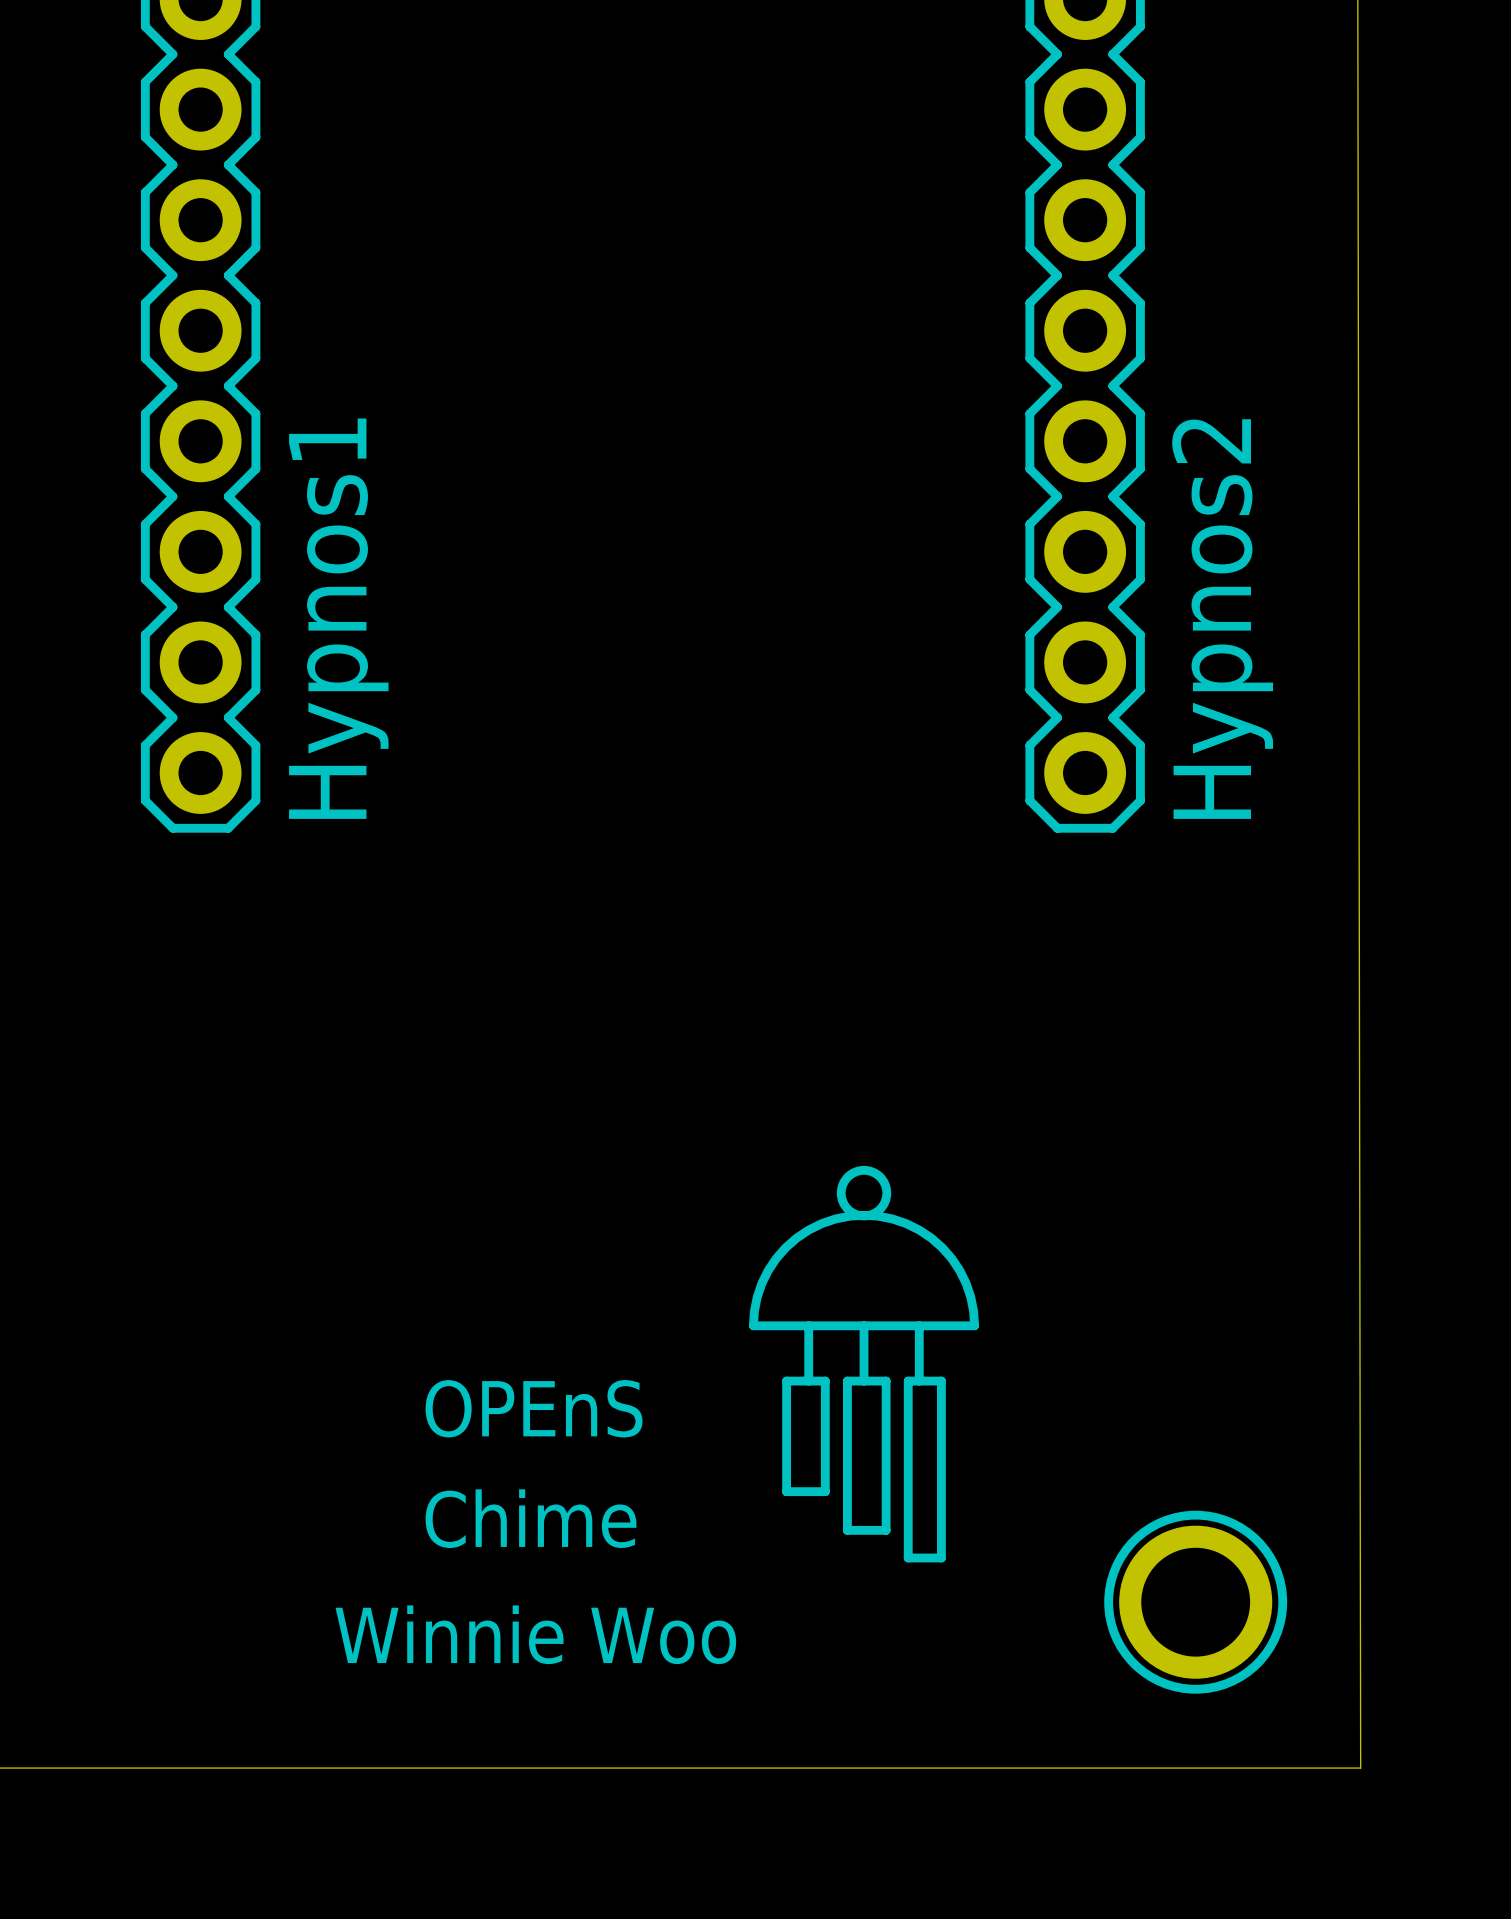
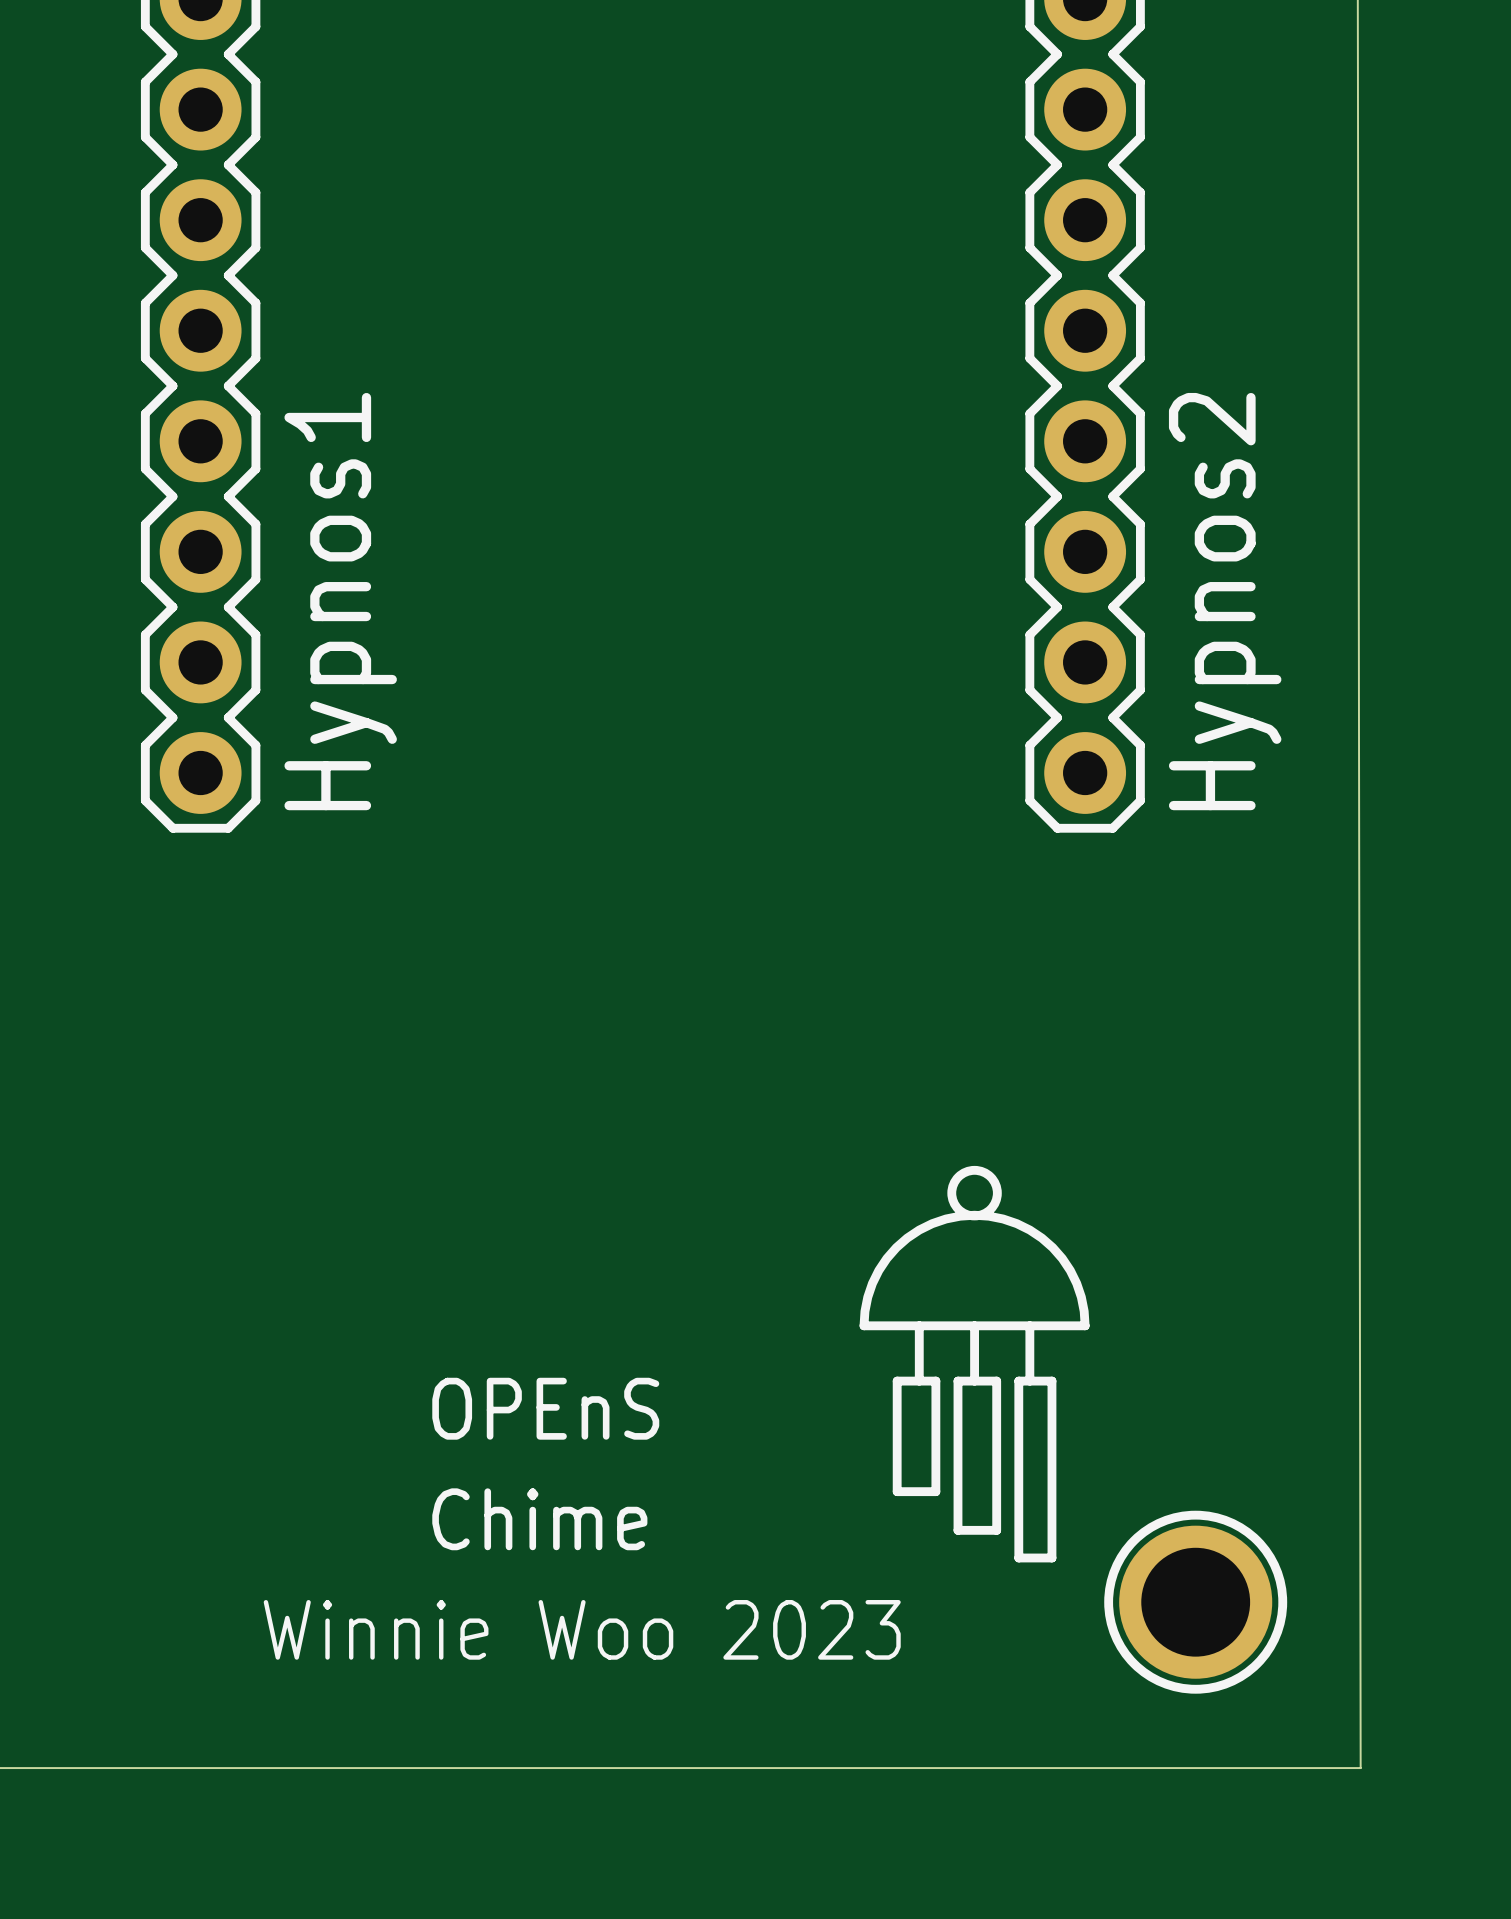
drawing position: (864, 1193) -> (974, 1193)
line: (808, 1325) (808, 1381) -> (1029, 1325) (1029, 1381)
line: none -> (864, 1325) (867, 1297) (878, 1270) (896, 1247) (919, 1230) (945, 1219) (974, 1215) (1003, 1219) (1029, 1230) (1052, 1247) (1070, 1270) (1081, 1297) (1085, 1325) (974, 1325) (974, 1381)
line: (974, 1325) (970, 1297) (959, 1270) (942, 1247) (919, 1230) (892, 1219) (864, 1215) (835, 1219) (808, 1230) (785, 1247) (768, 1270) (757, 1297) (753, 1325) (864, 1325) (864, 1381) -> none
line: (786, 1381) (825, 1381) (825, 1491) (786, 1491) (786, 1381) -> none
line: (847, 1381) (886, 1381) (886, 1530) (847, 1530) (847, 1381) -> (957, 1381) (996, 1381) (996, 1530) (957, 1530) (957, 1381)
line: (908, 1381) (908, 1557) (941, 1557) (941, 1381) (935, 1381) -> (908, 1381) (897, 1381) (897, 1491) (935, 1491) (935, 1381)
line: none -> (1018, 1381) (1051, 1381) (1051, 1557) (1018, 1557) (1018, 1381)
text: Winnie Woo (535, 1634) -> Winnie Woo 2023 (582, 1629)

